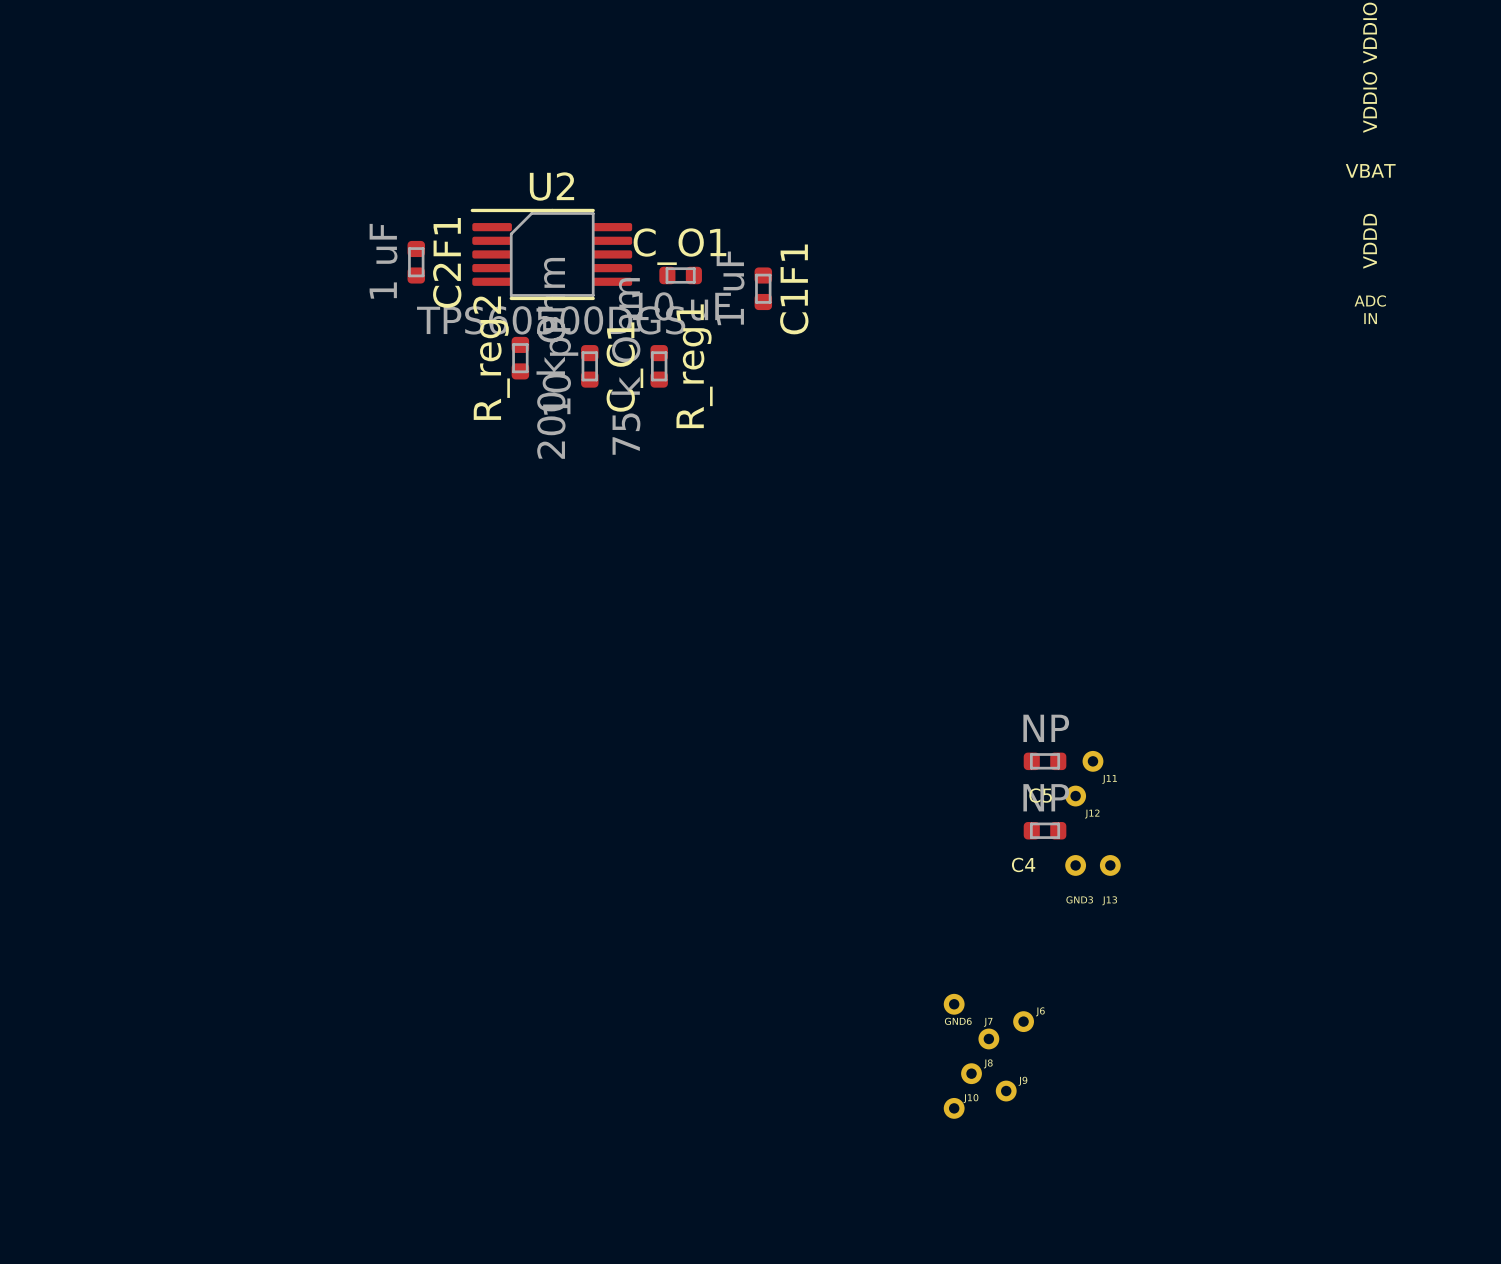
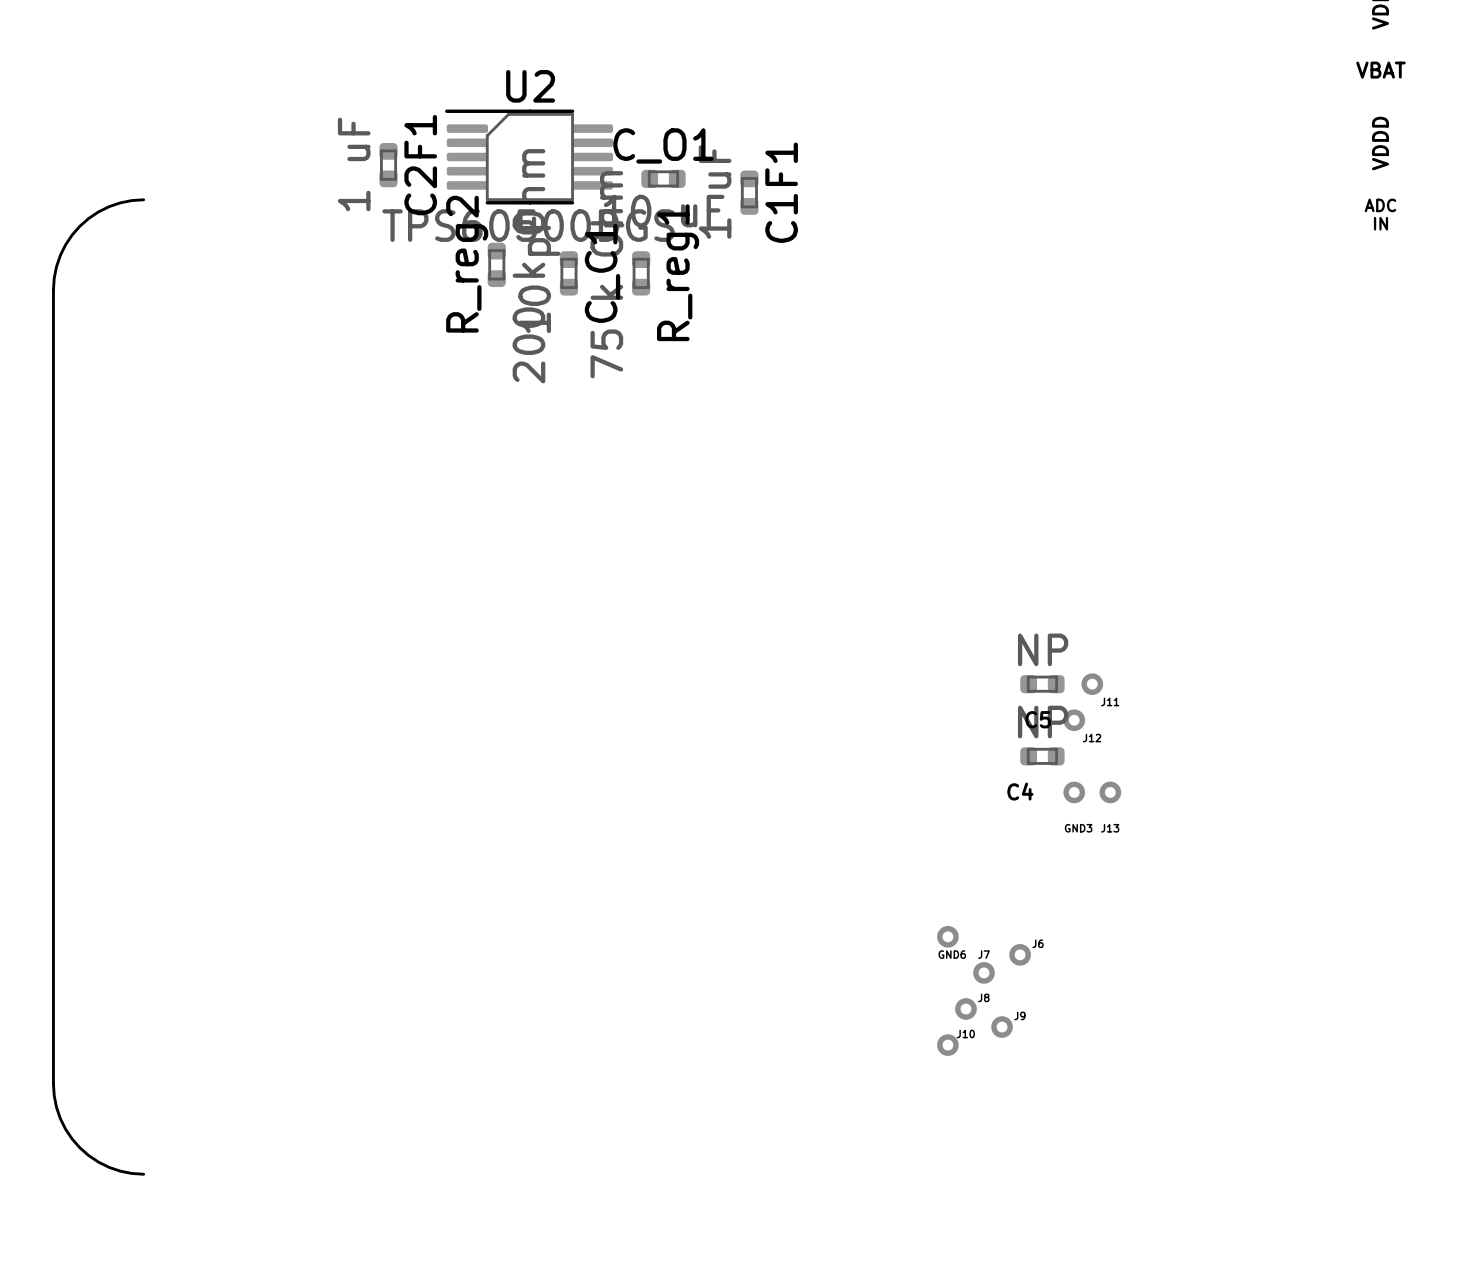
board edge: none -> (143, 199) (120, 202) (109, 206) (88, 218) (79, 226) (65, 244) (60, 255) (56, 266) (53, 290) (54, 1095) (56, 1107) (65, 1129) (72, 1138) (88, 1155) (98, 1162) (120, 1171) (143, 1174)

